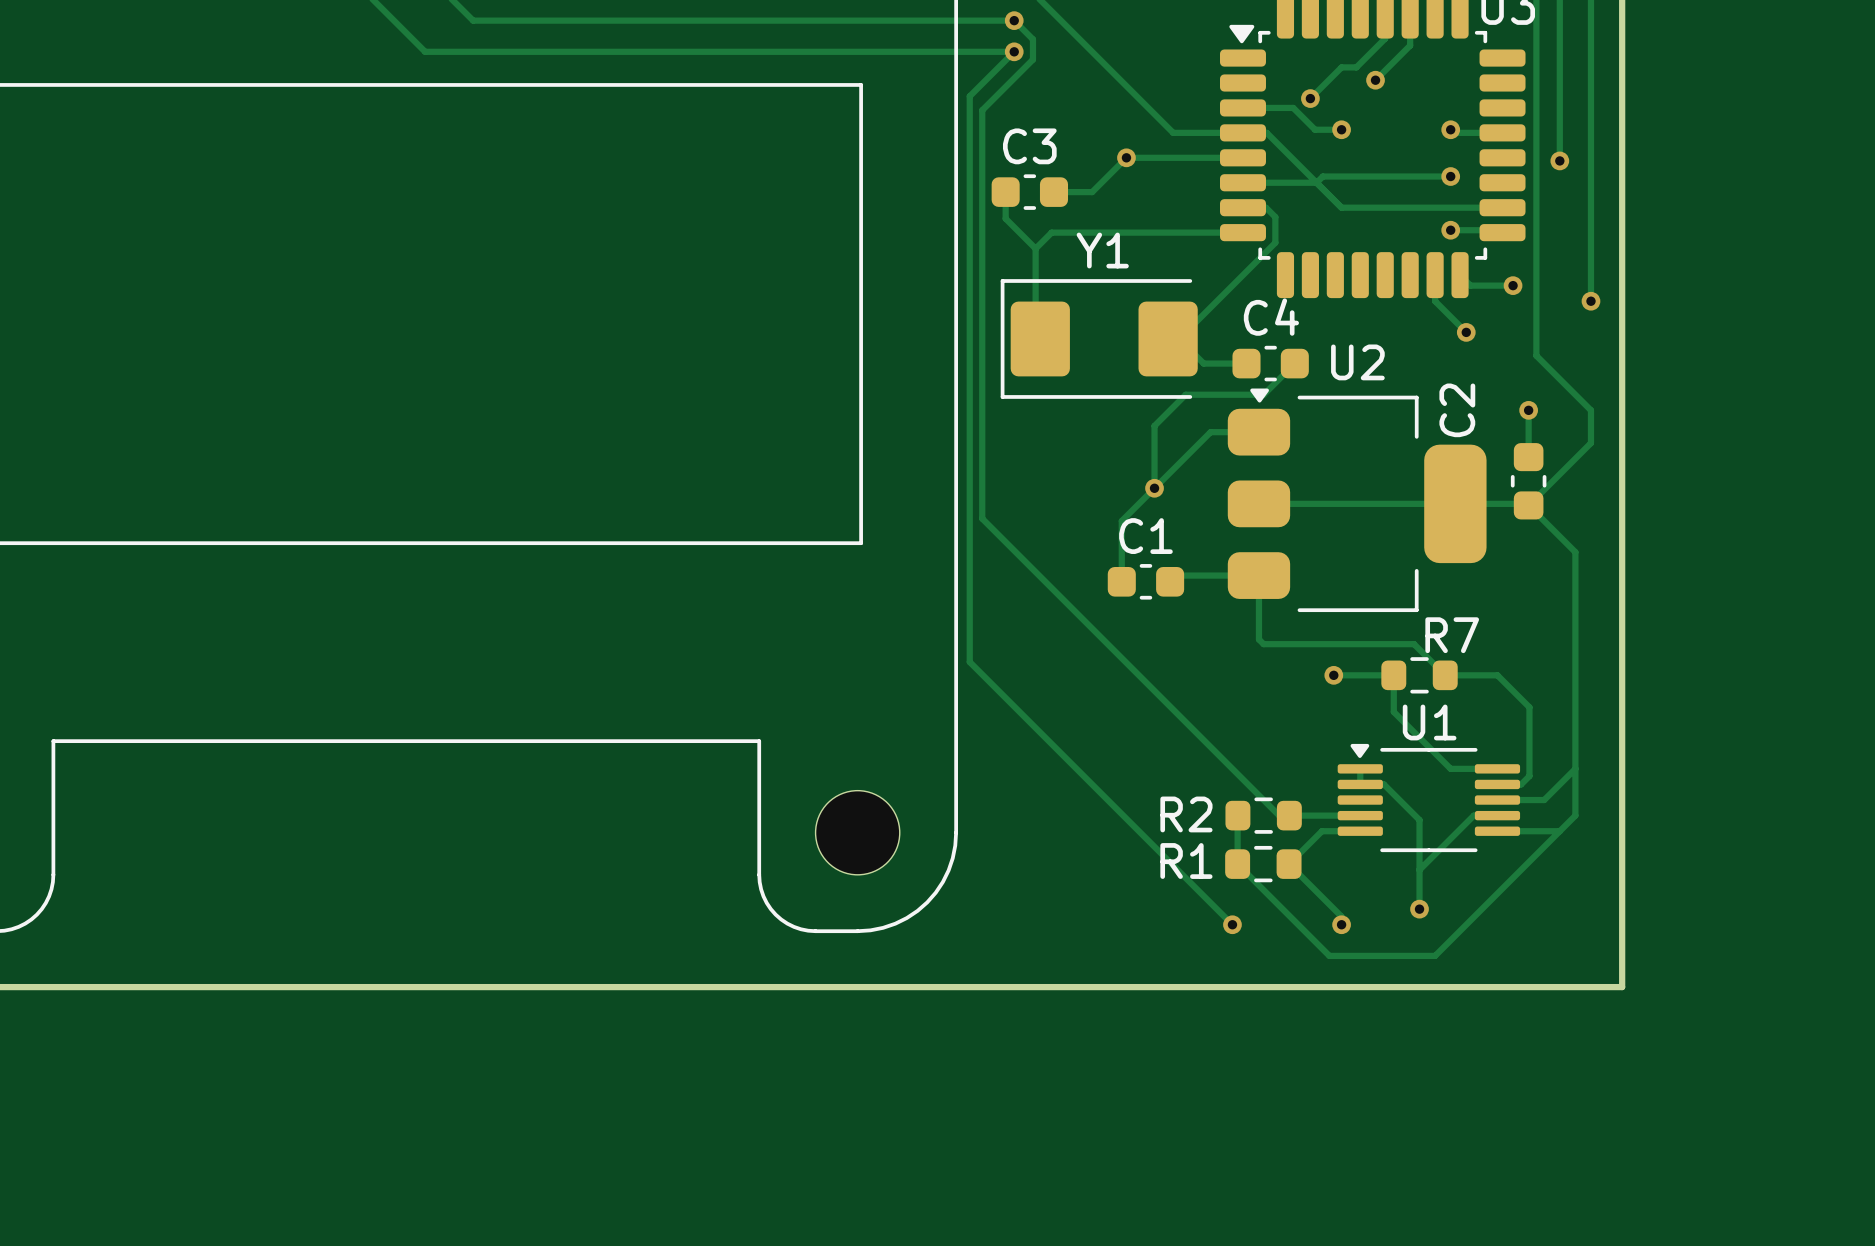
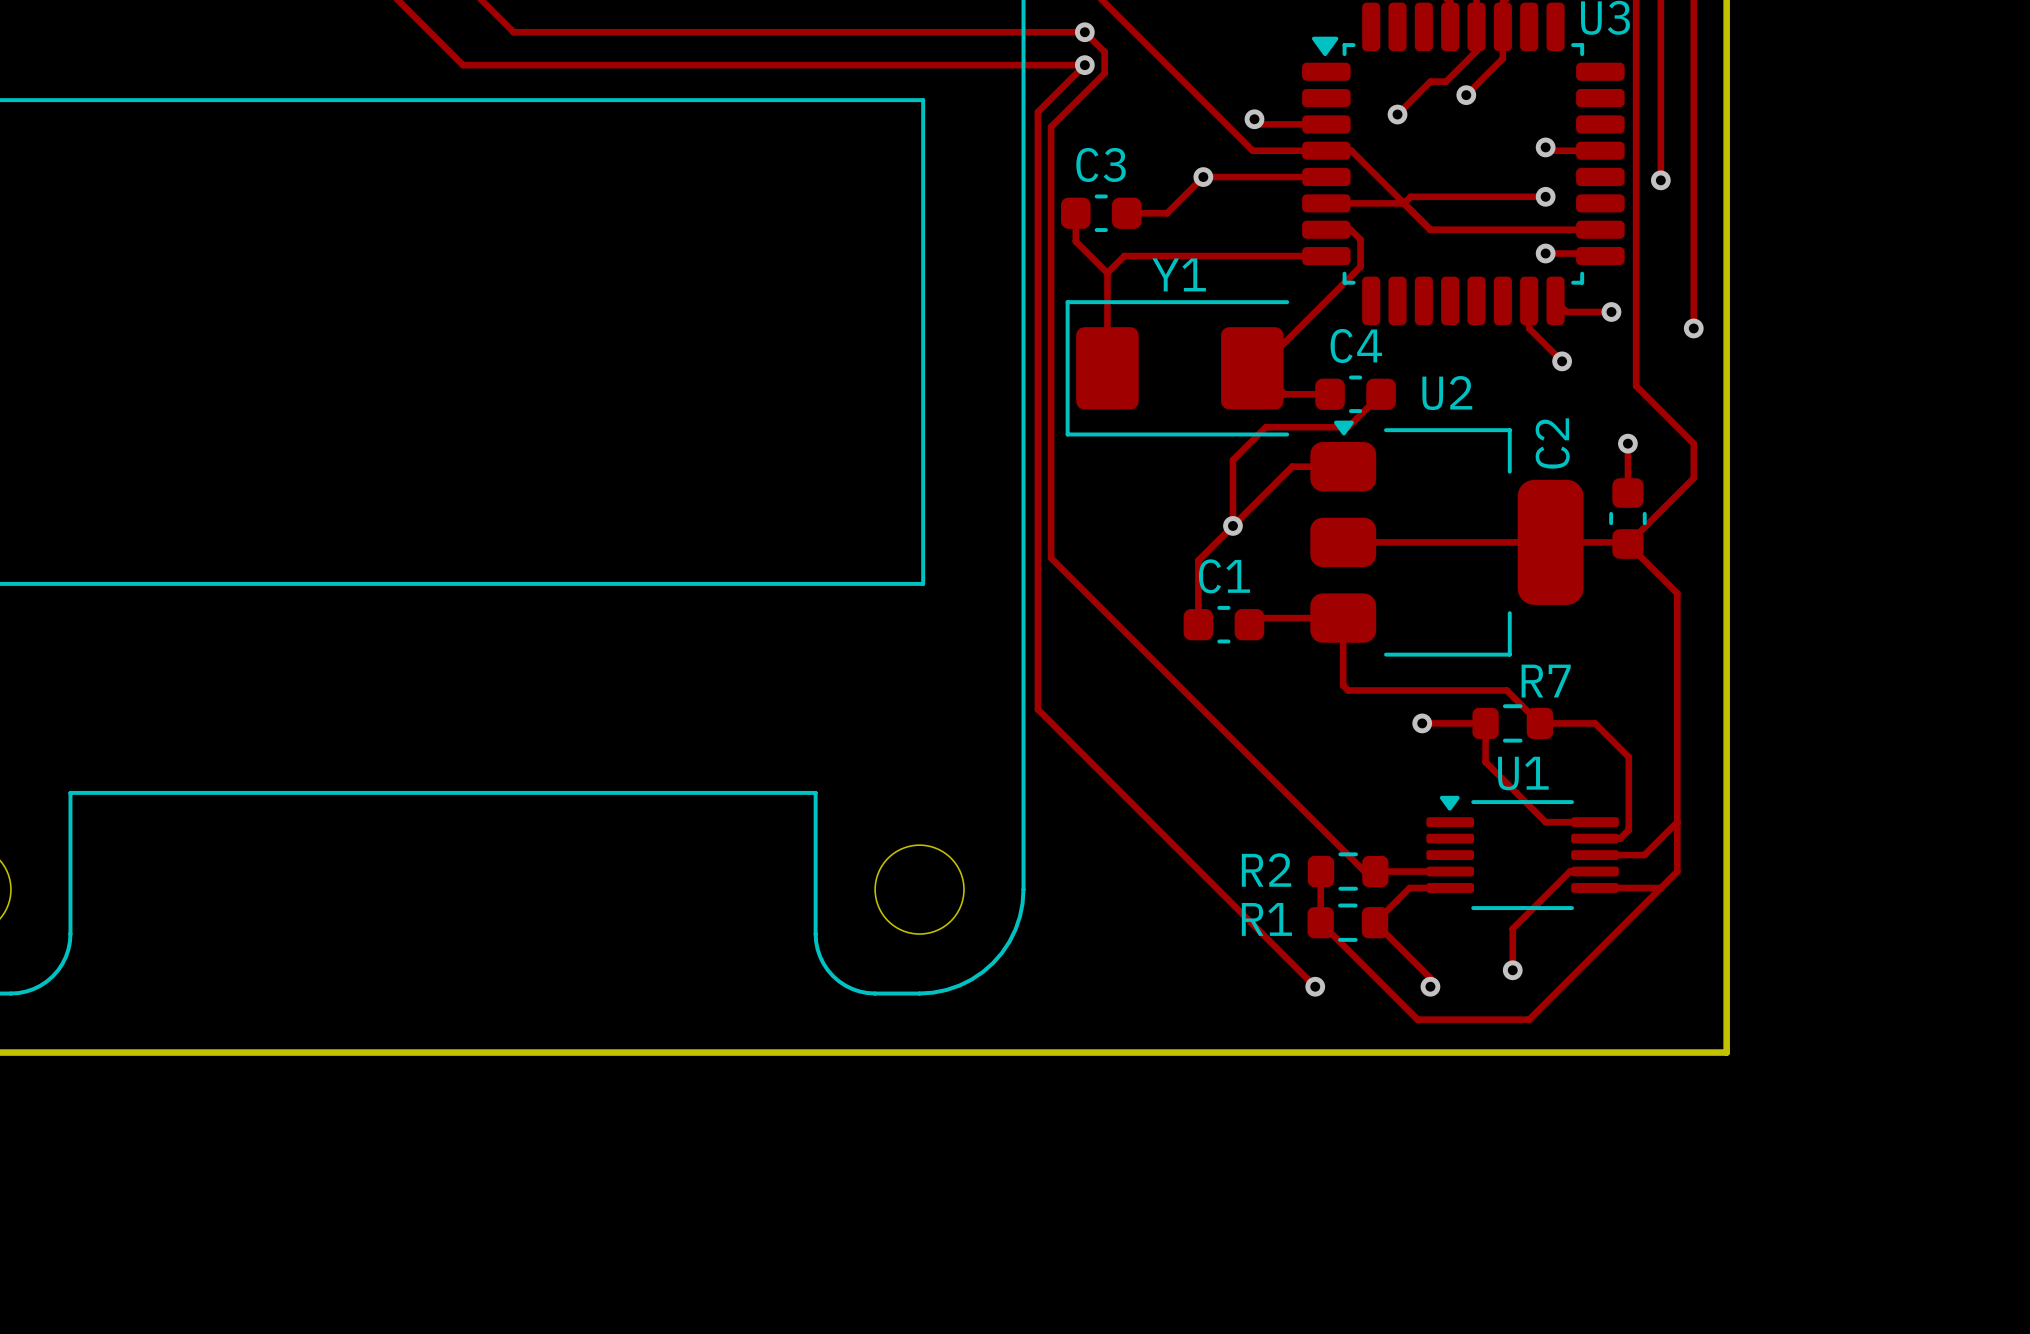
track: (1242, 107) (1293, 107) (1315, 129) (1341, 129) -> (1326, 124) (1259, 124) (1254, 119)
via position: (1341, 129) -> (1254, 119)
Y1 footprint: [1000, 279, 1198, 399] -> [1065, 300, 1290, 437]
track: (1360, 768) (1360, 784) (1383, 784) (1419, 820) (1419, 869) -> none

